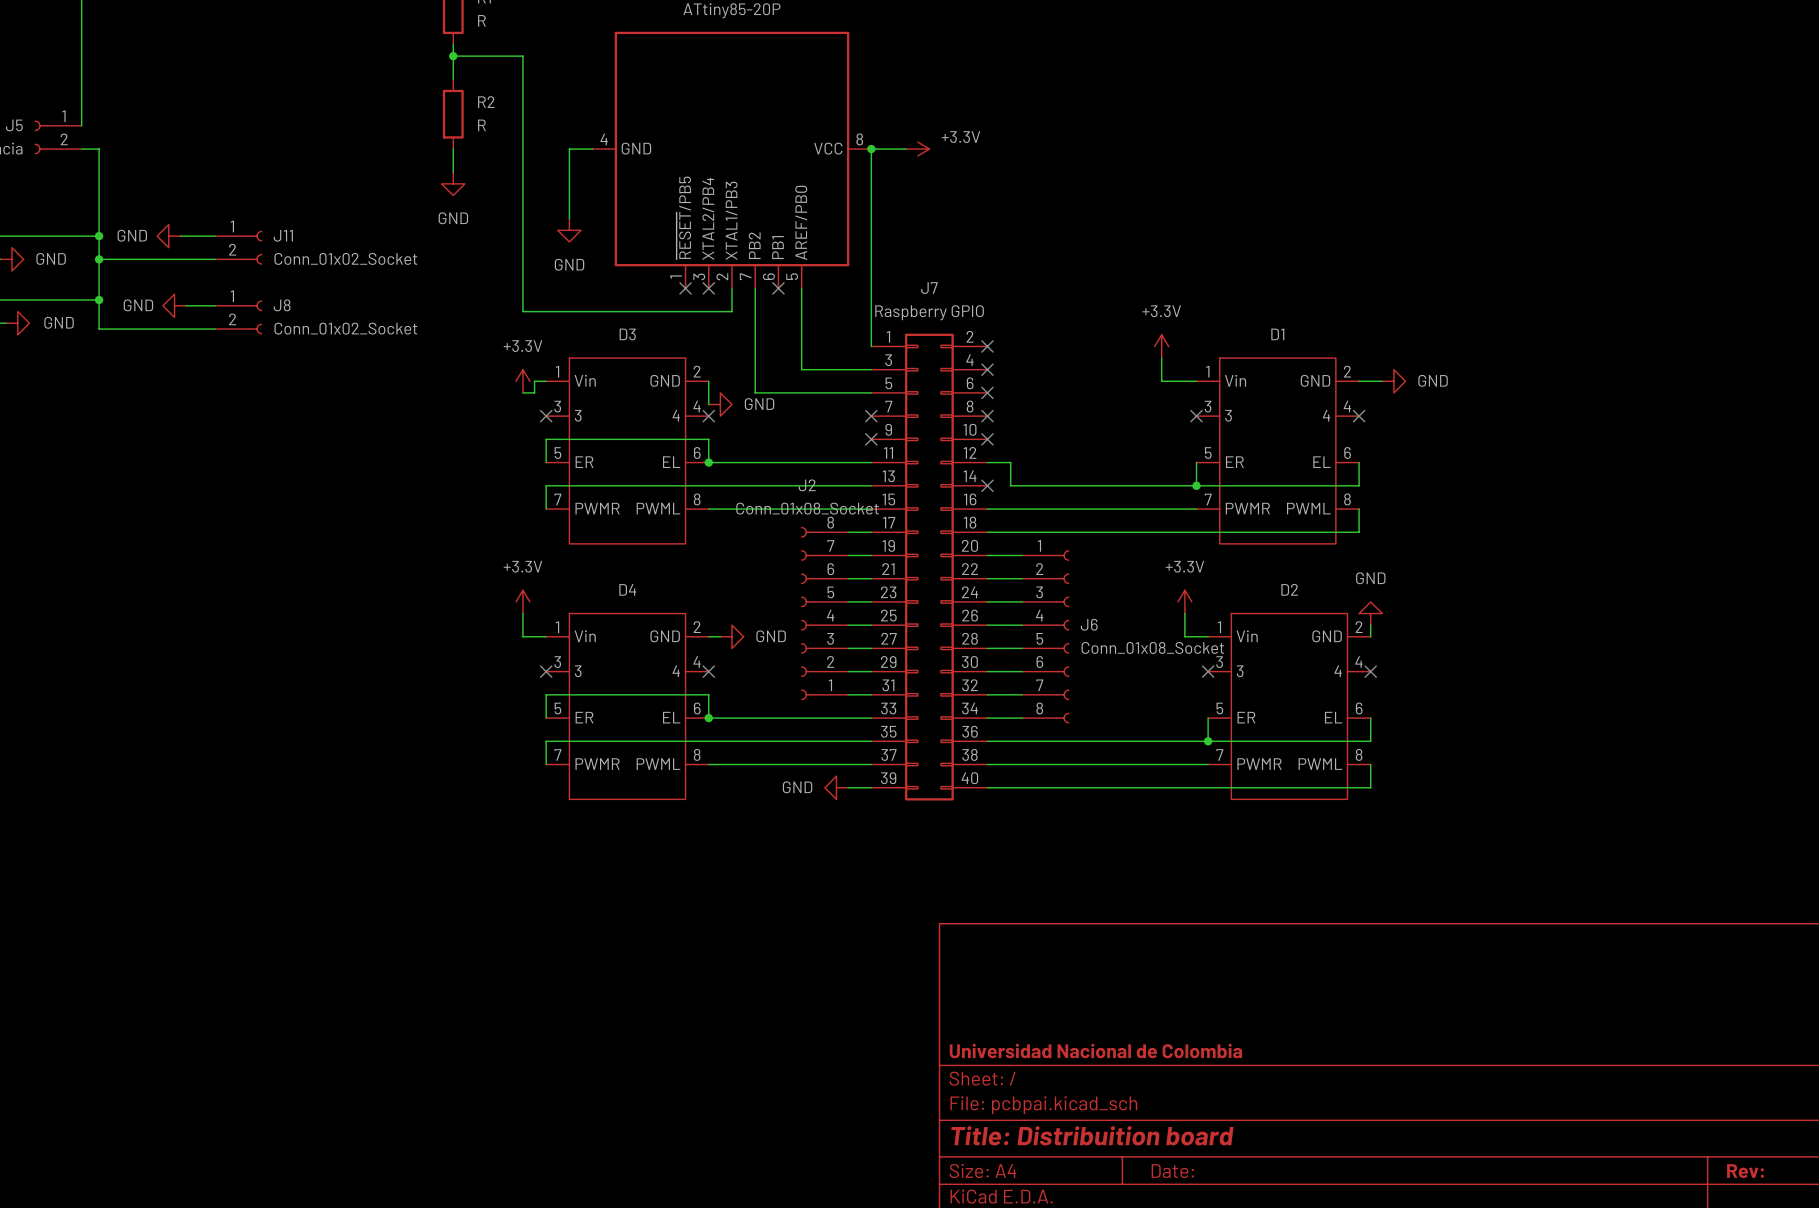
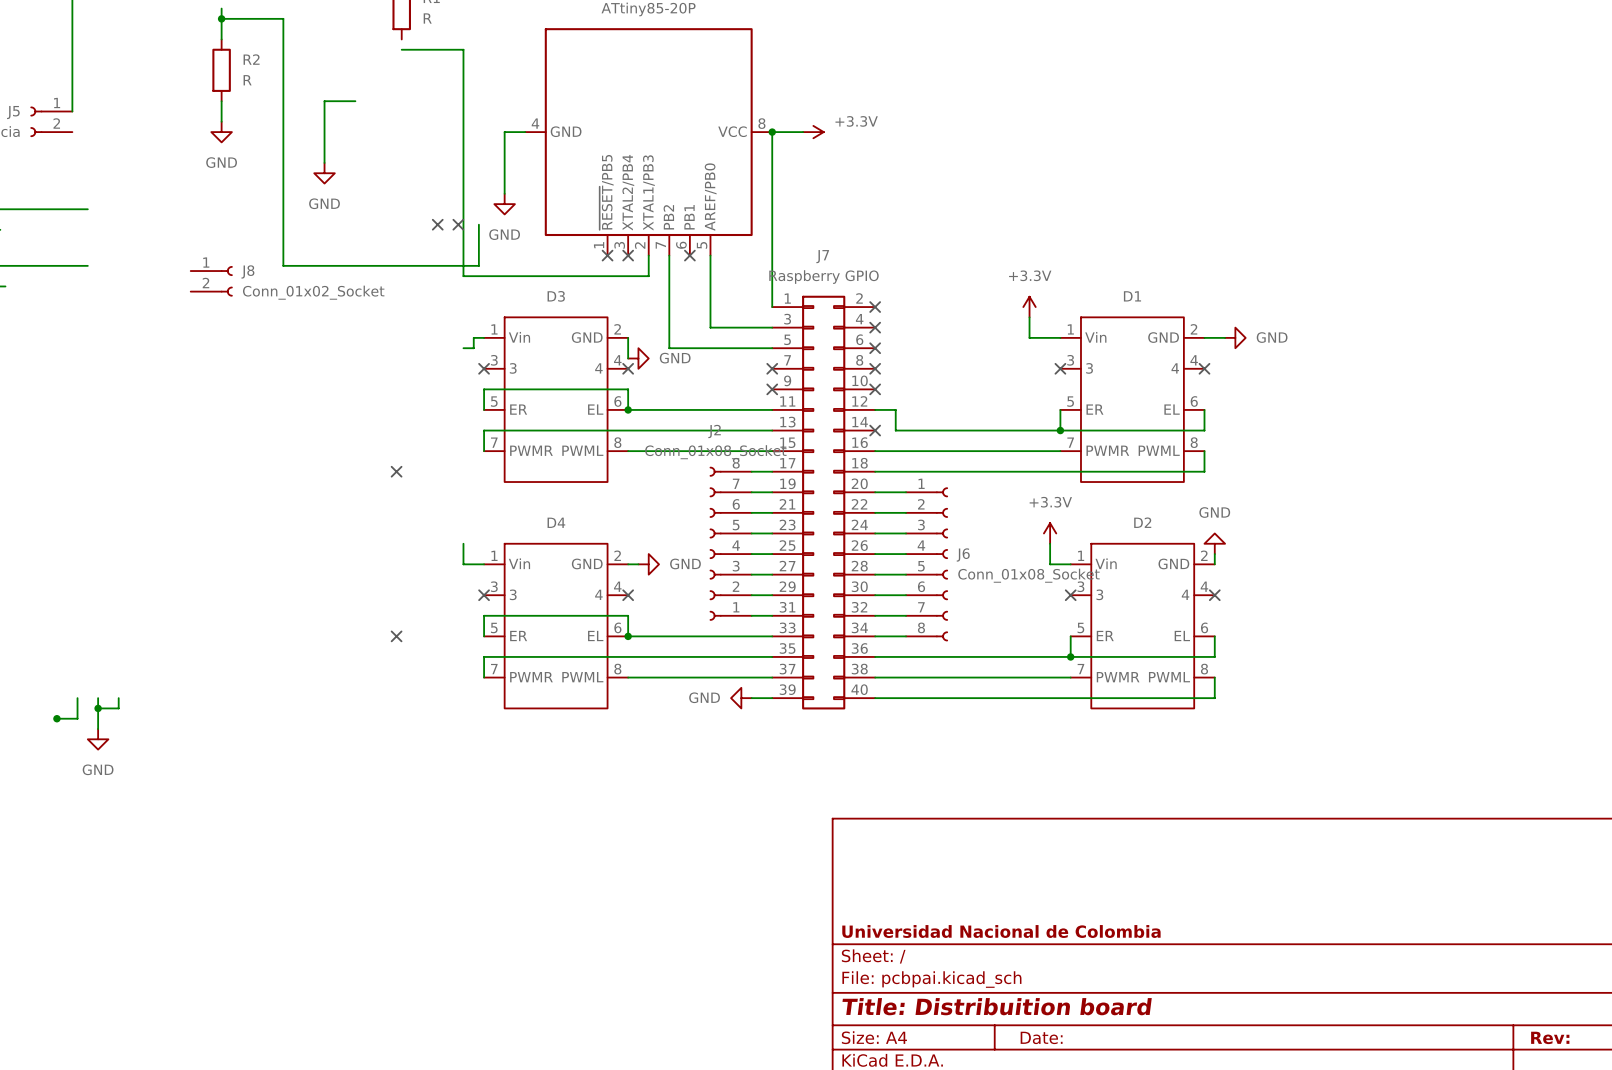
wire: none -> (221, 18) (283, 18) (283, 265) (478, 265) (478, 224)
junction: none -> (221, 18)
wire: (453, 44) (453, 79) -> (221, 8) (221, 39)
junction: (453, 56) -> none
wire: none -> (355, 101) (324, 101) (324, 162)
R2 position: (453, 114) -> (221, 70)
wire: (81, 149) (99, 149) (99, 329) (215, 329) -> none
power symbol: none -> GND (221, 132)
wire: (453, 149) (453, 172) -> (221, 101) (221, 121)
power symbol position: GND (453, 183) -> GND (324, 173)
junction: (99, 236) -> none
power symbol: GND (168, 236) -> none
wire: (180, 236) (215, 236) -> none
J11: Conn_01x02_Socket (238, 247) -> none
no-connect mark: none -> (437, 224)
no-connect mark: none -> (458, 224)
power symbol: GND (11, 259) -> none
wire: (99, 259) (215, 259) -> none
junction: (99, 259) -> none
junction: (99, 300) -> none
power symbol: GND (174, 305) -> none
wire: (186, 305) (215, 305) -> none
power symbol: GND (17, 323) -> none
power symbol: +3.3V (522, 381) -> none
no-connect mark: none -> (396, 471)
power symbol: +3.3V (522, 601) -> none
no-connect mark: none -> (396, 636)
wire: none -> (77, 698) (77, 718) (56, 718)
wire: none -> (98, 698) (98, 729)
wire: none -> (118, 698) (118, 708) (98, 708)
junction: none -> (98, 708)
junction: none -> (56, 718)
power symbol: none -> GND (98, 739)

